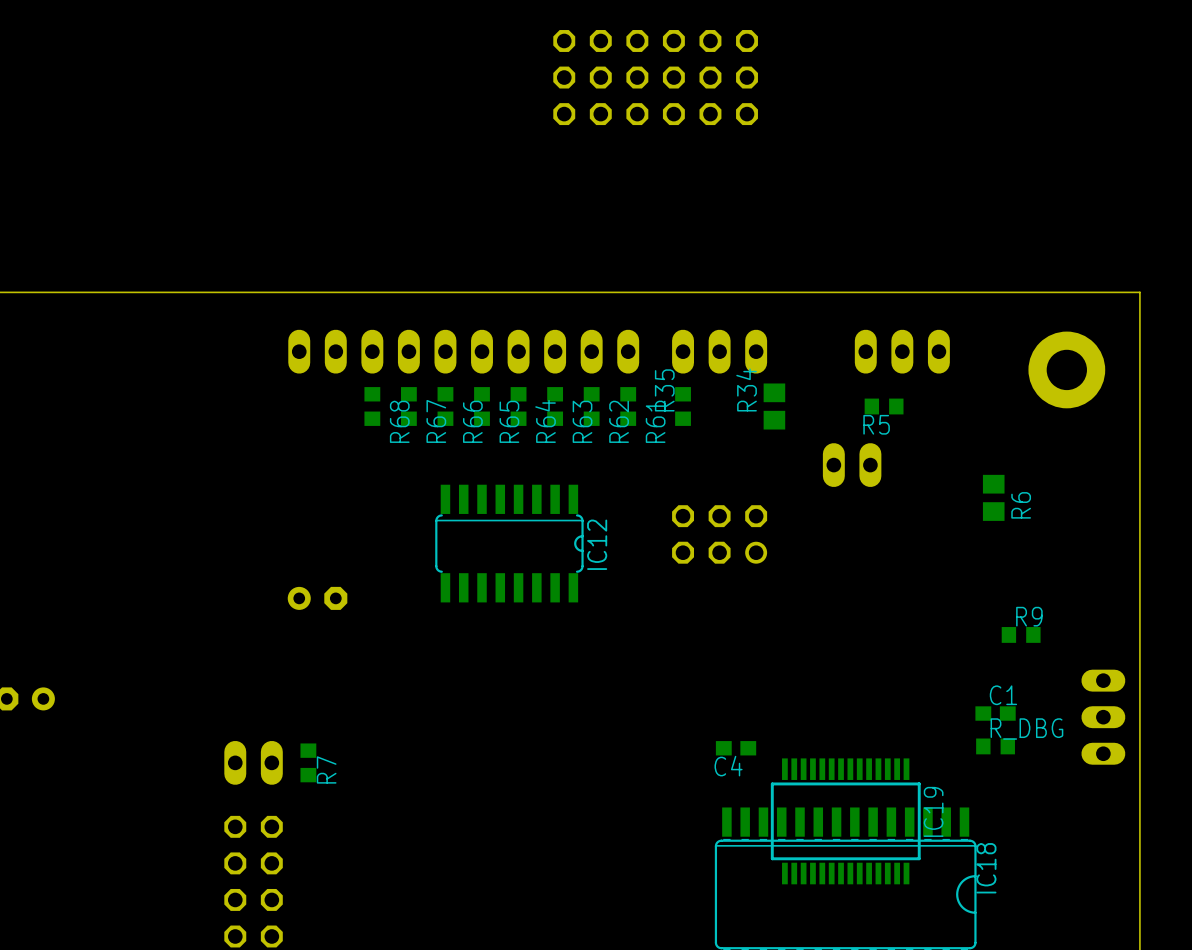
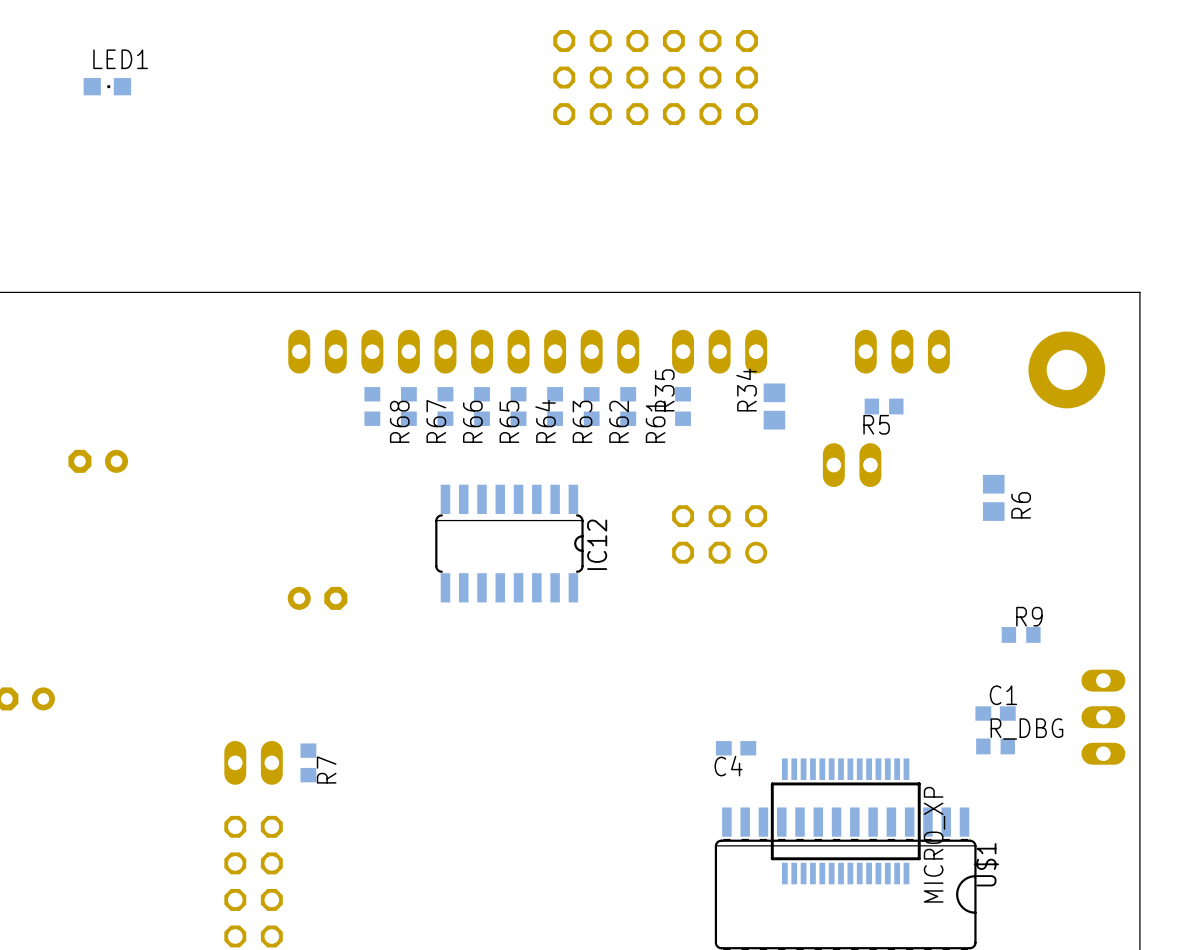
LED1: none -> (107, 86)
part: none -> (98, 461)
IC19 name: IC19 (933, 811) -> MICRO_XP (934, 844)
IC18 name: IC18 (986, 868) -> U$1 (986, 864)

